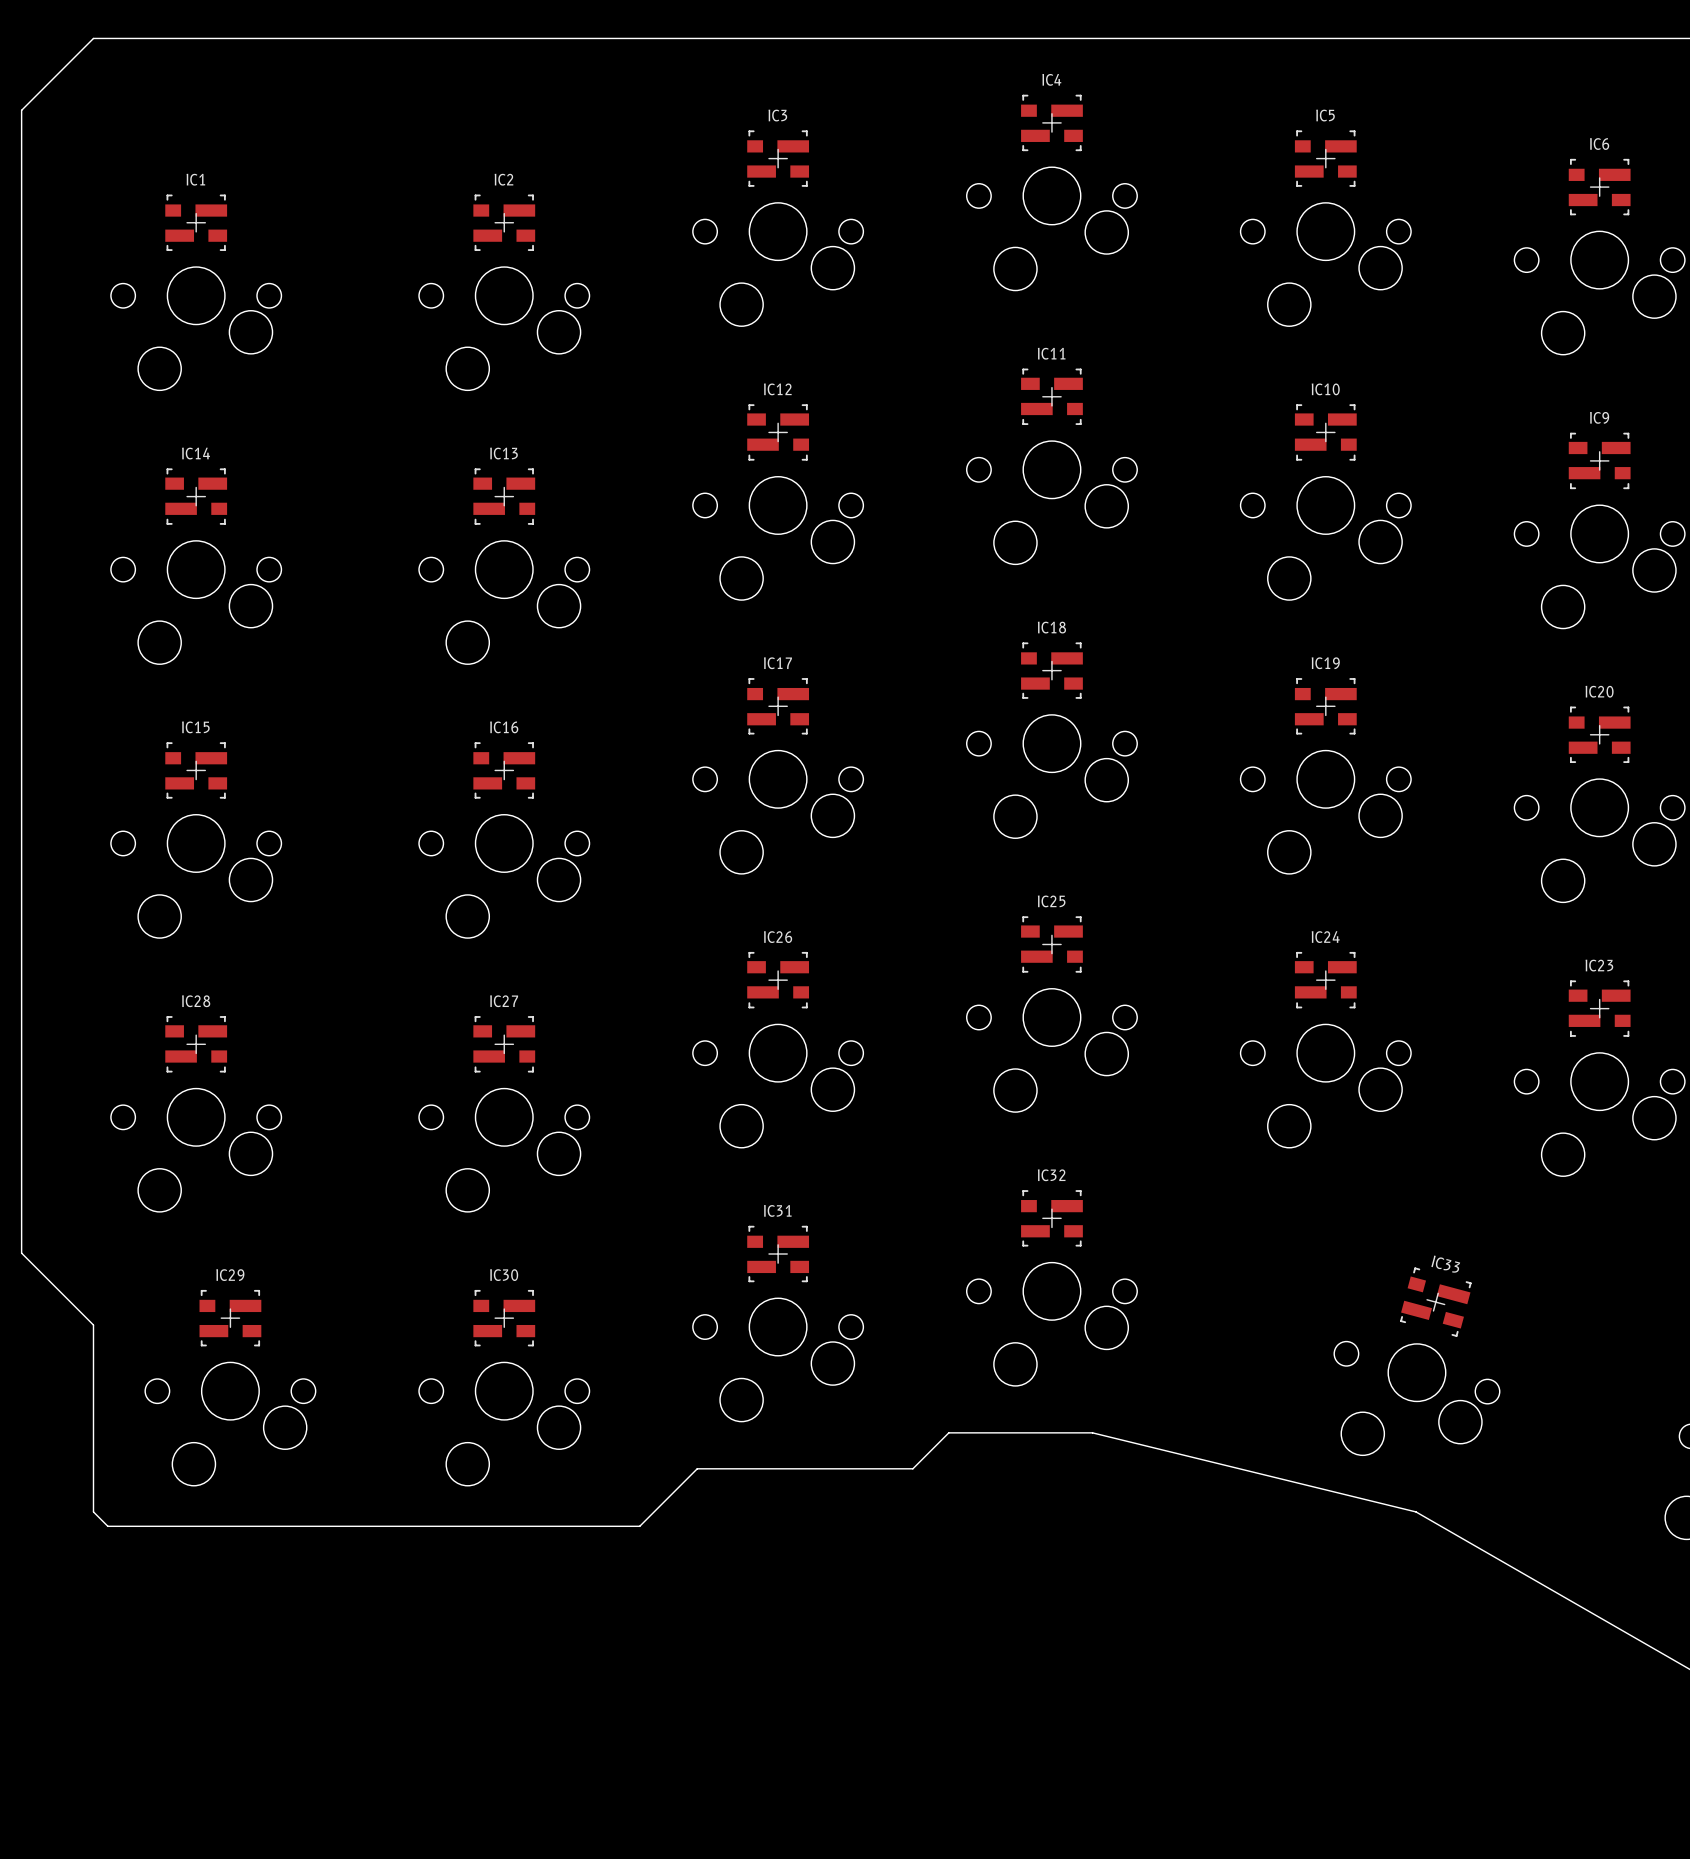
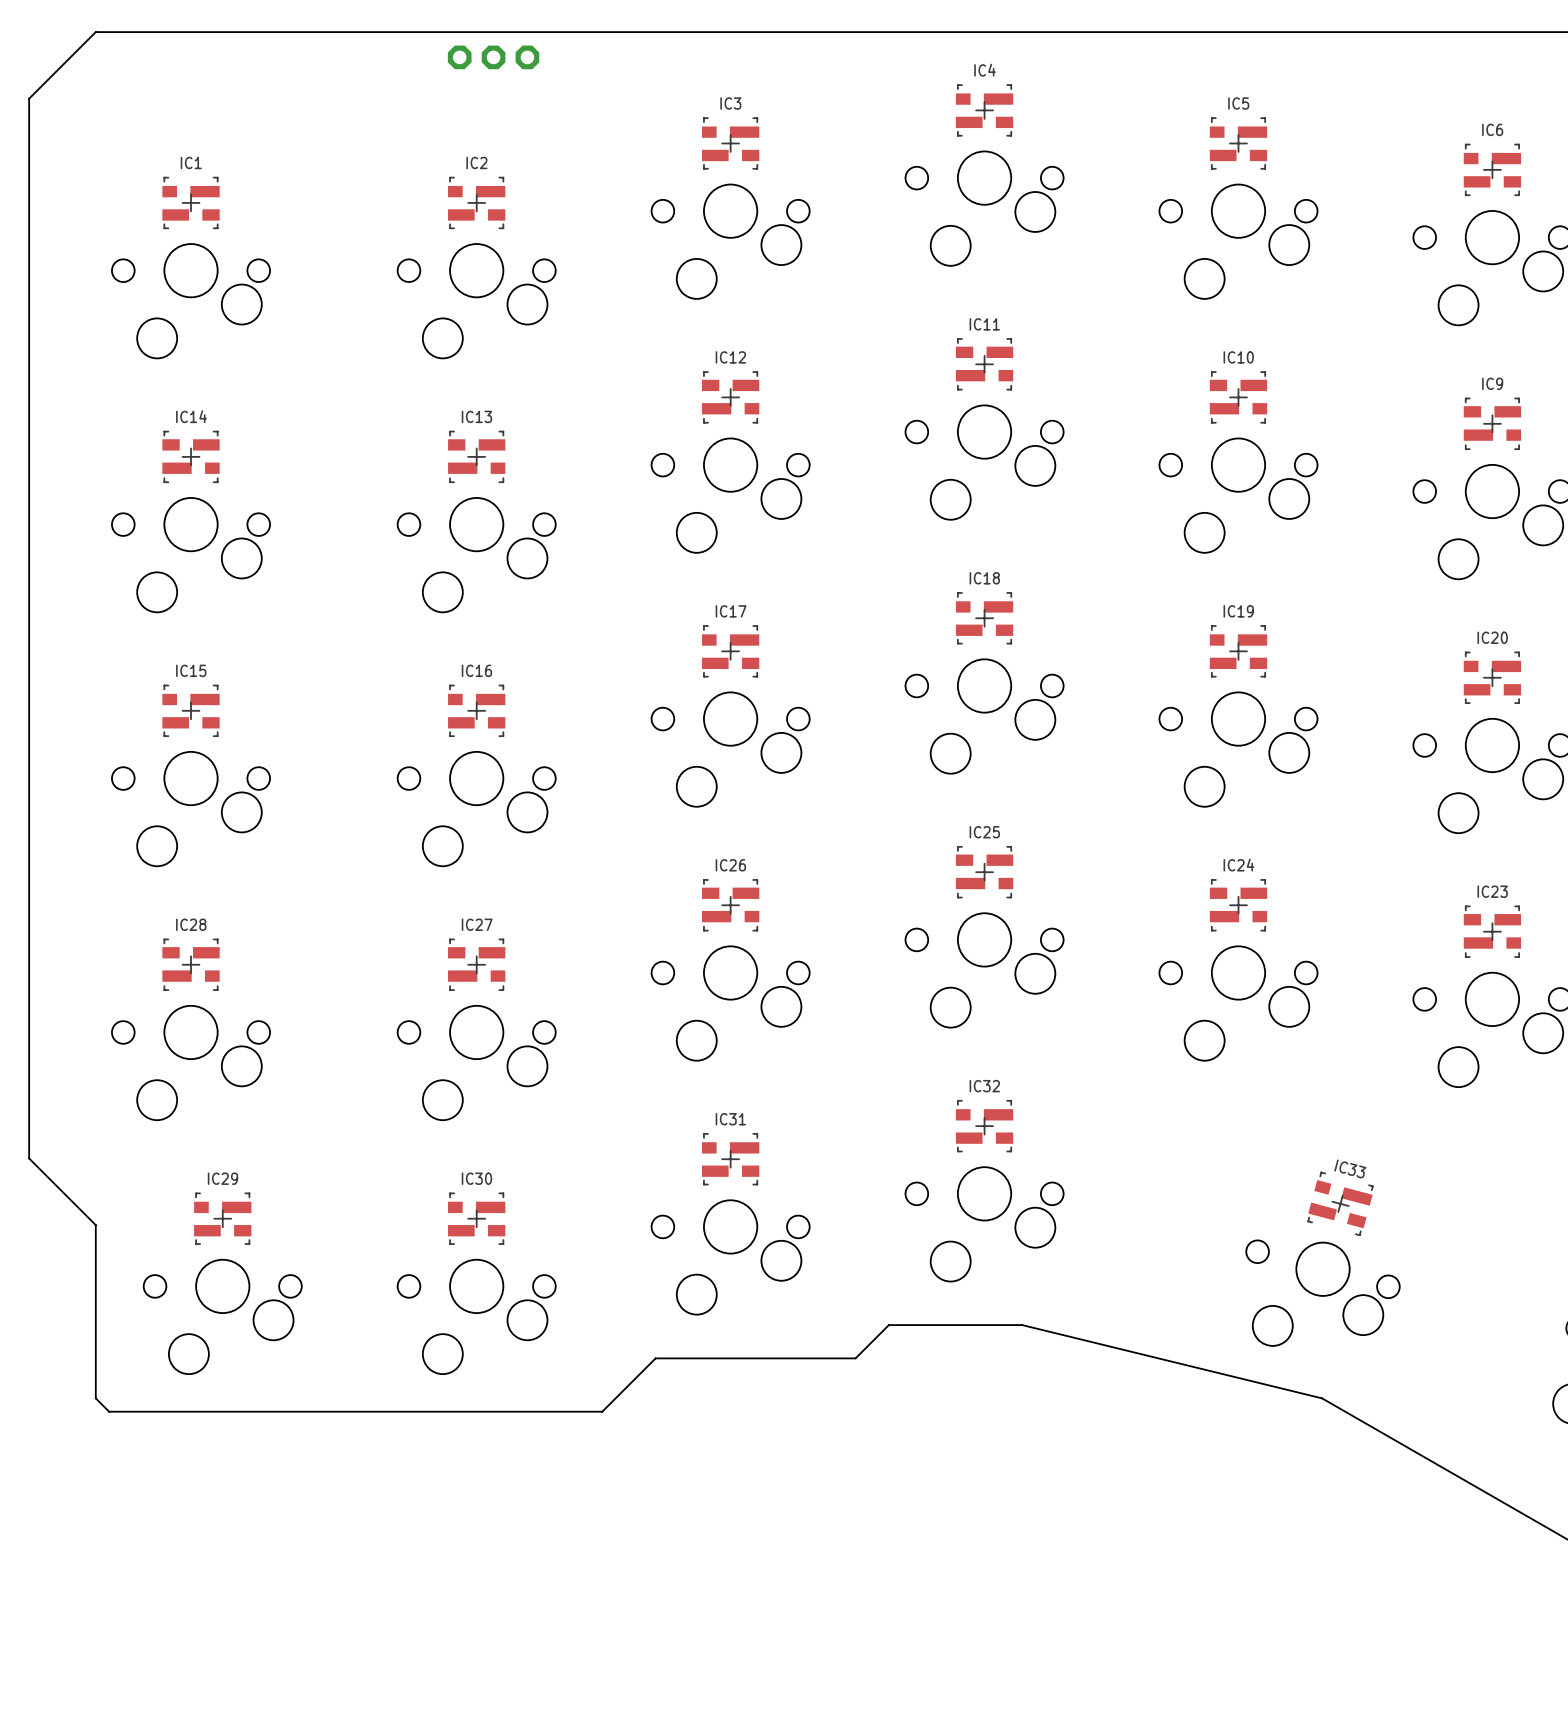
part: none -> (493, 57)

